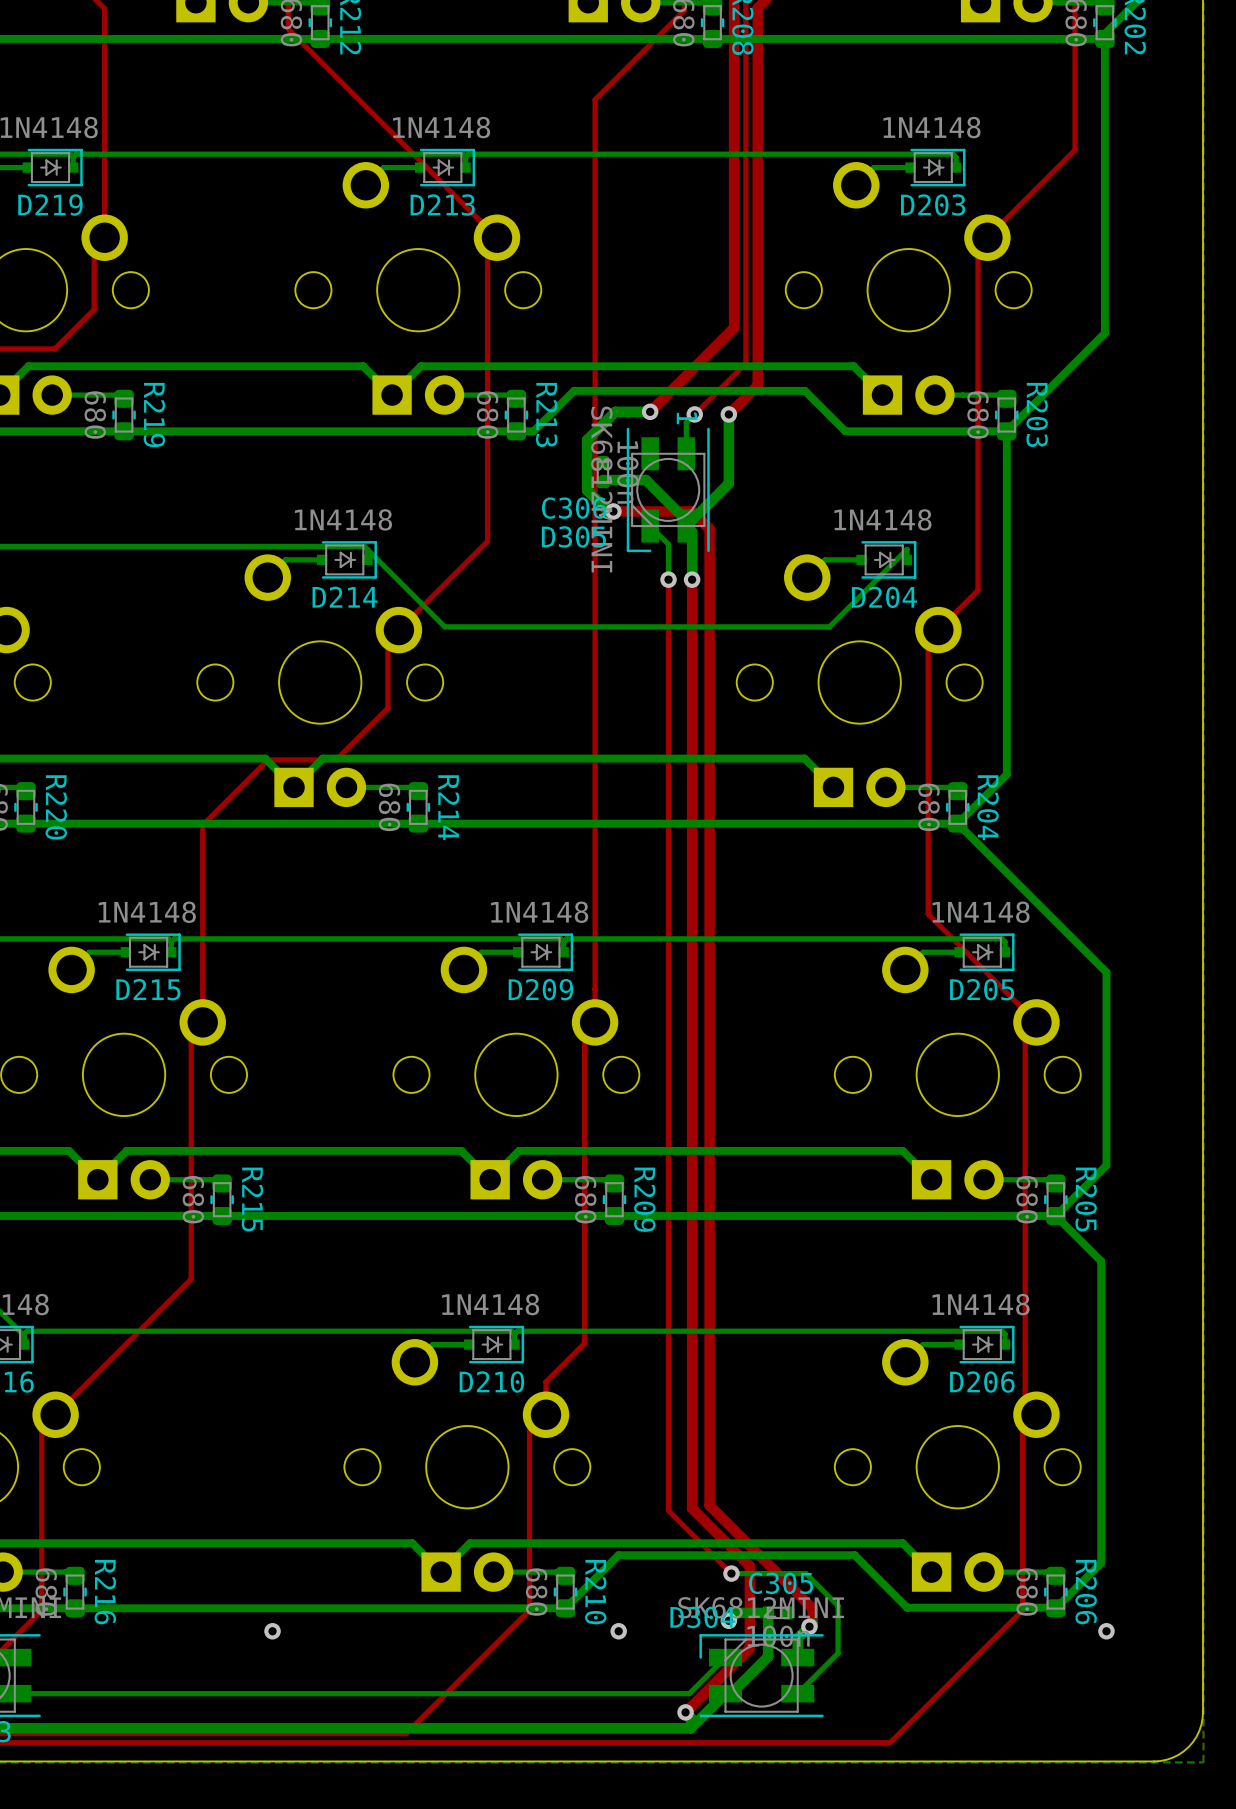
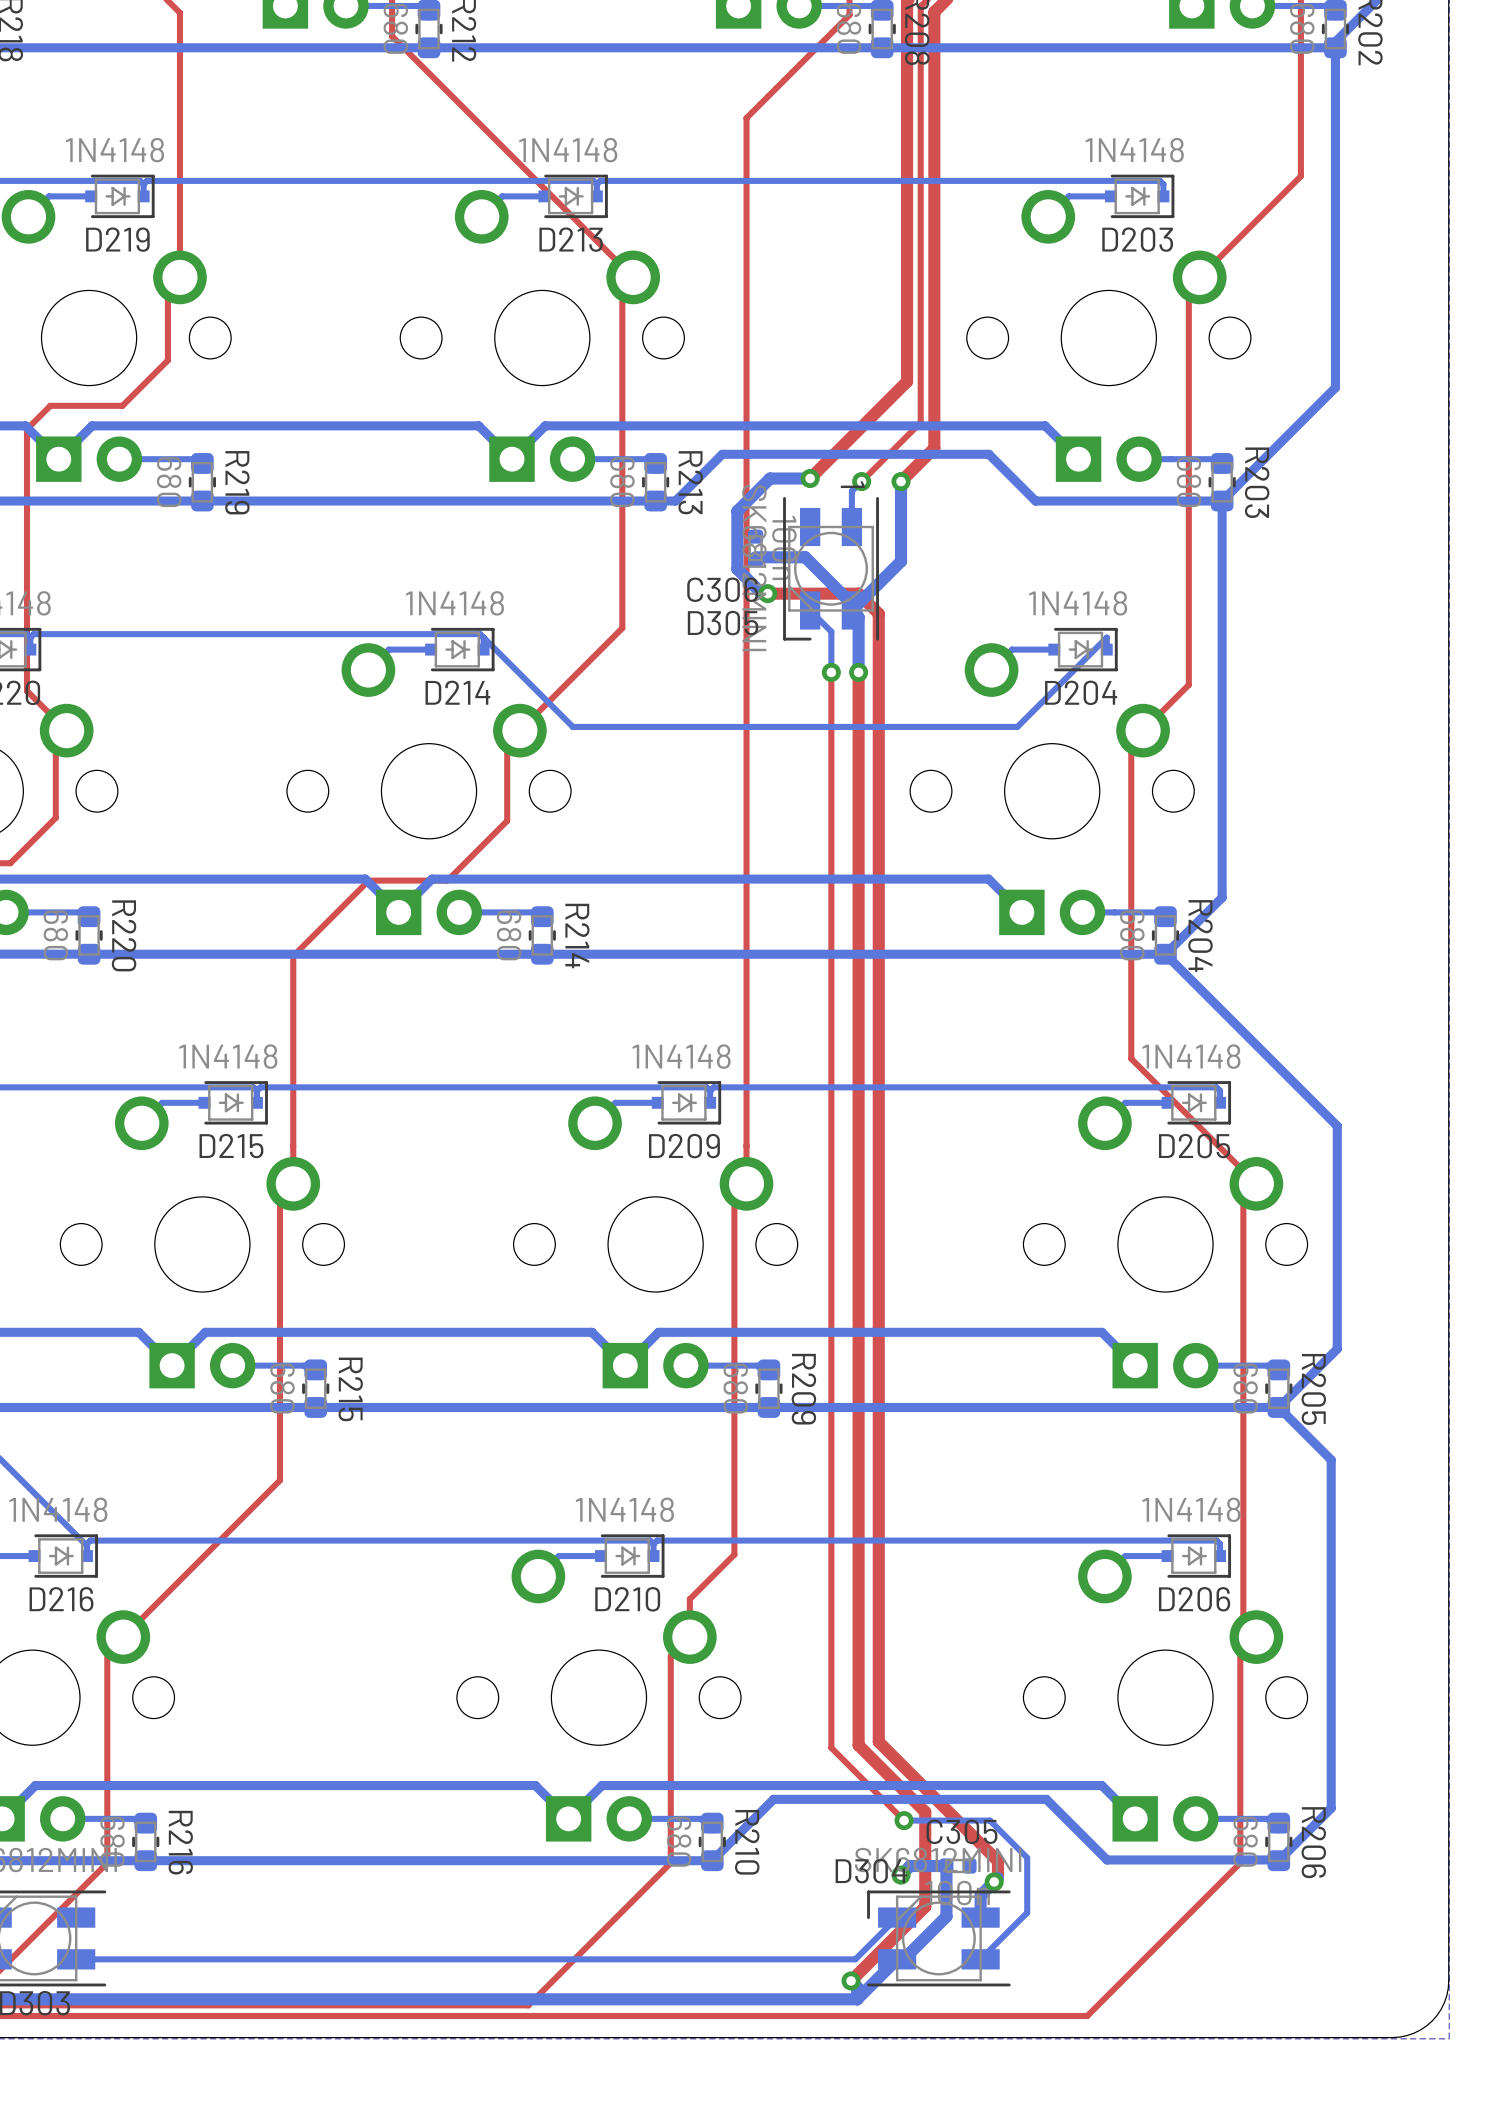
via: (272, 1631) -> none
via: (618, 1631) -> none
via: (1106, 1631) -> none

